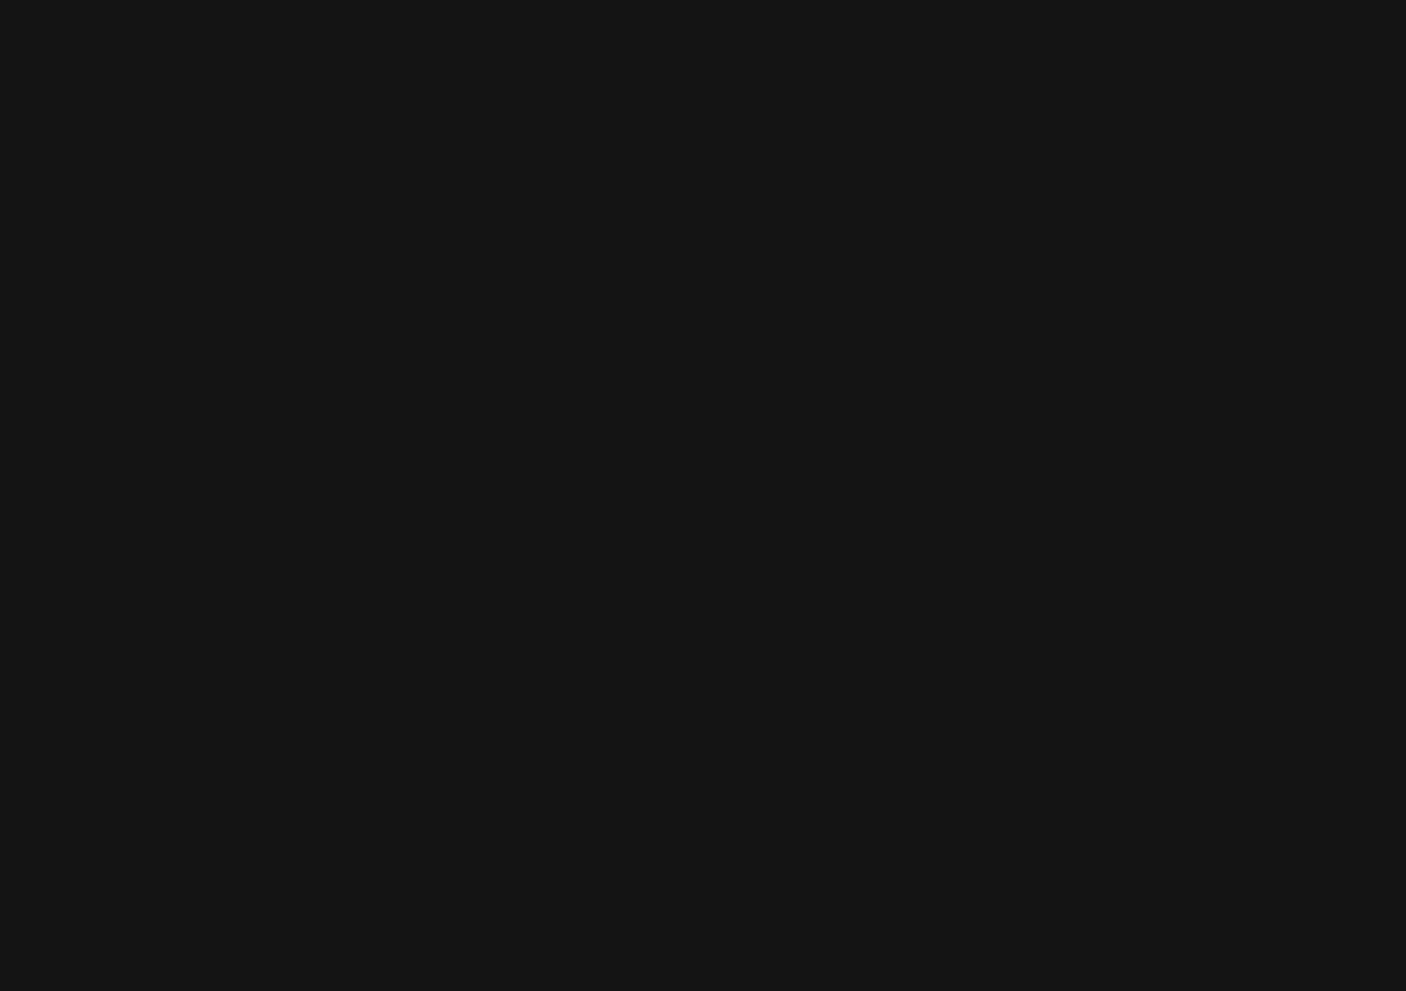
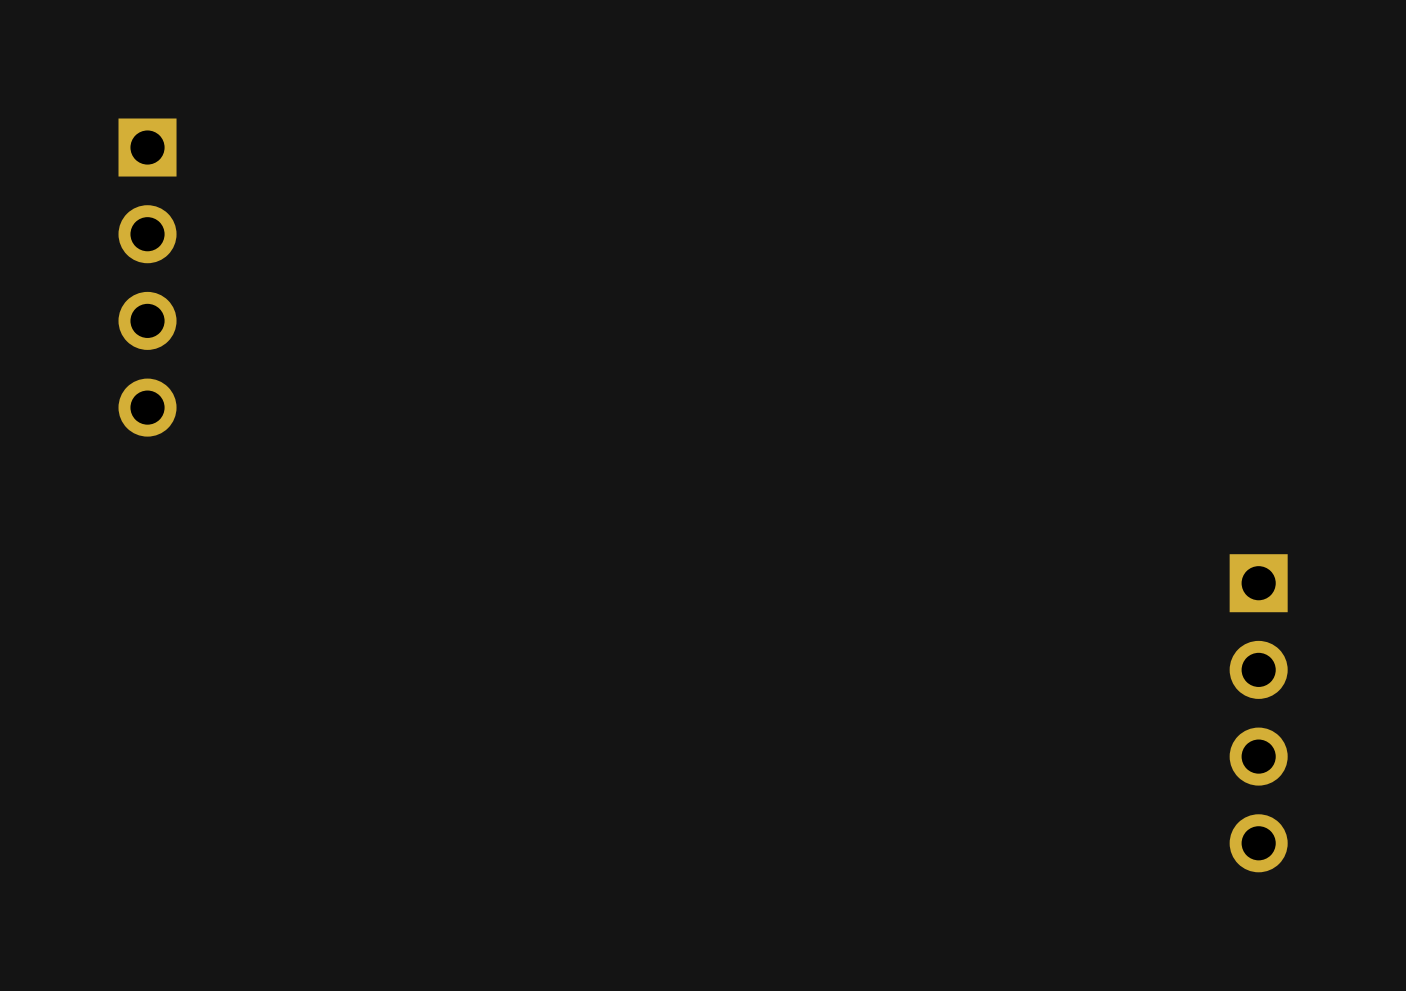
part: none -> (147, 277)
part: none -> (1258, 713)

